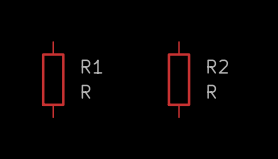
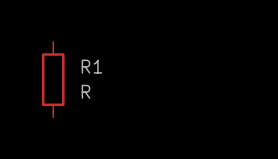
R2: R (179, 79) -> none

